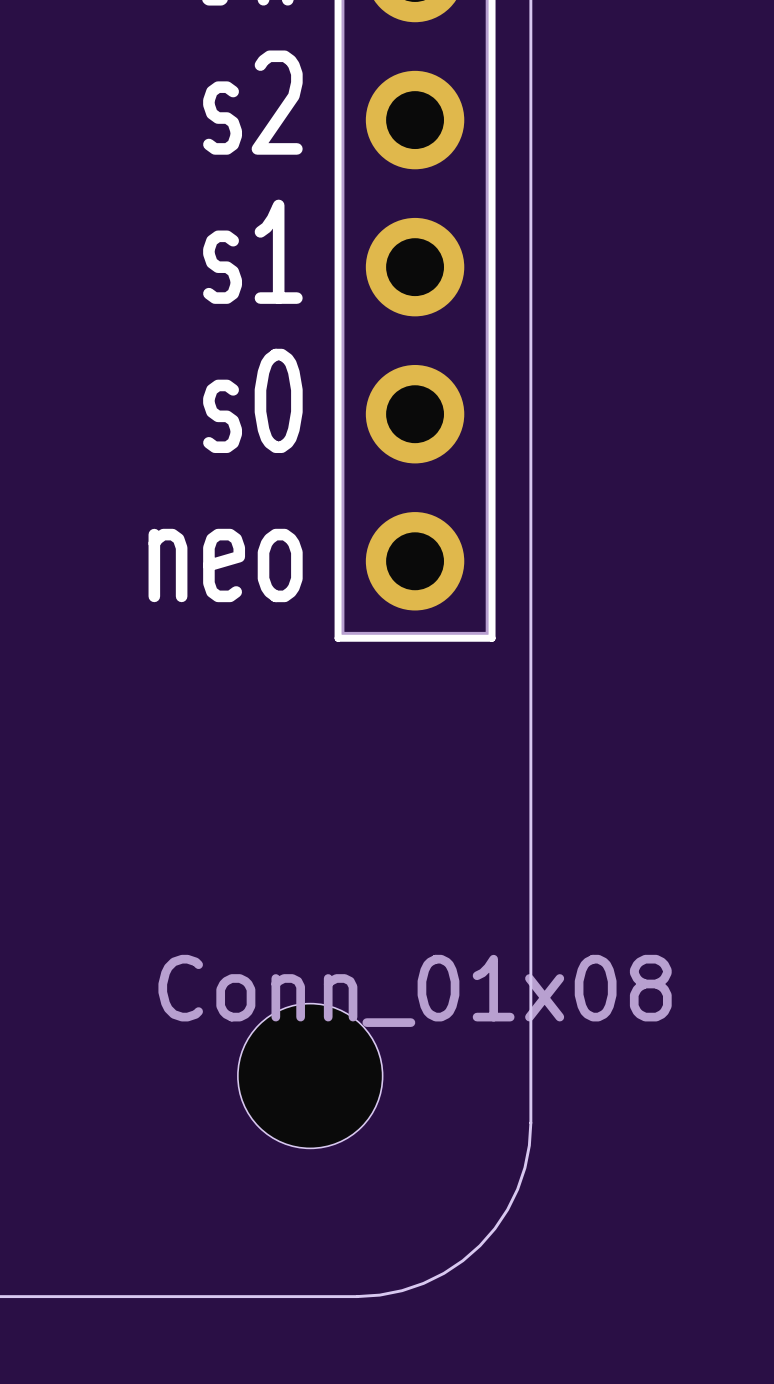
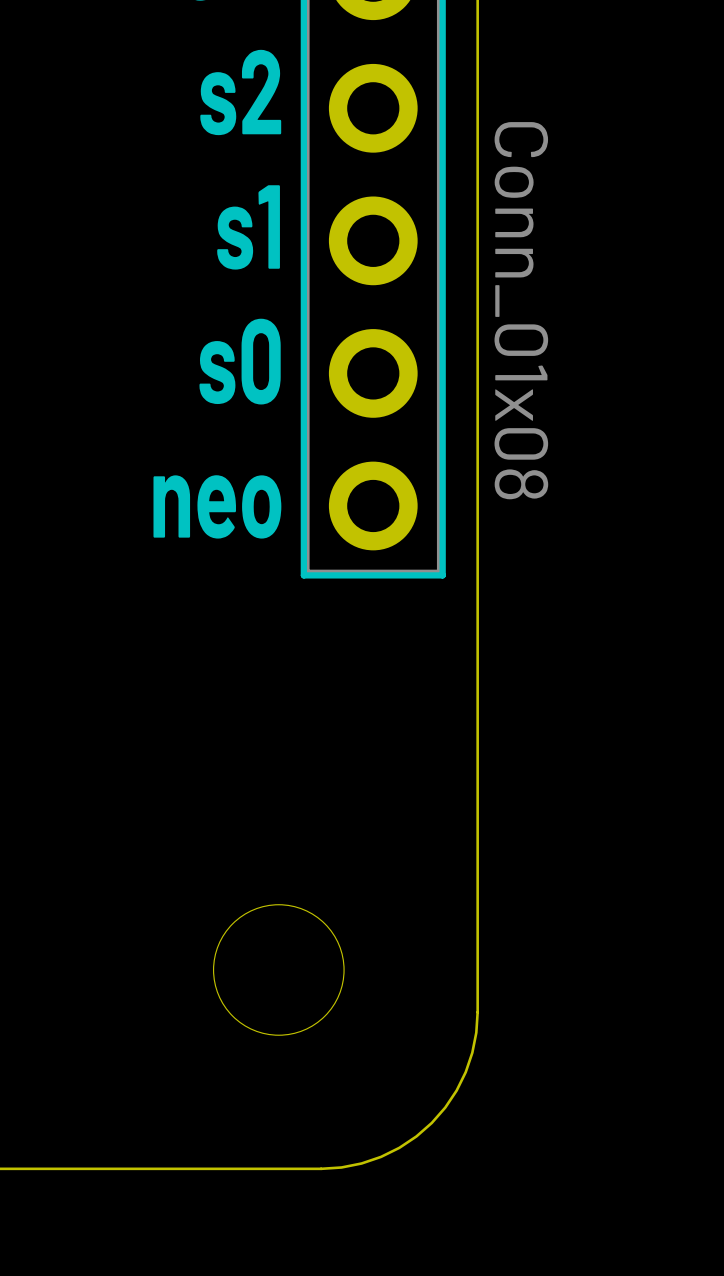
part value rotation: 0° (415, 990) -> 90° clockwise (521, 310)
part value position: Conn_01x08 (415, 990) -> Conn_01x08 (521, 310)

